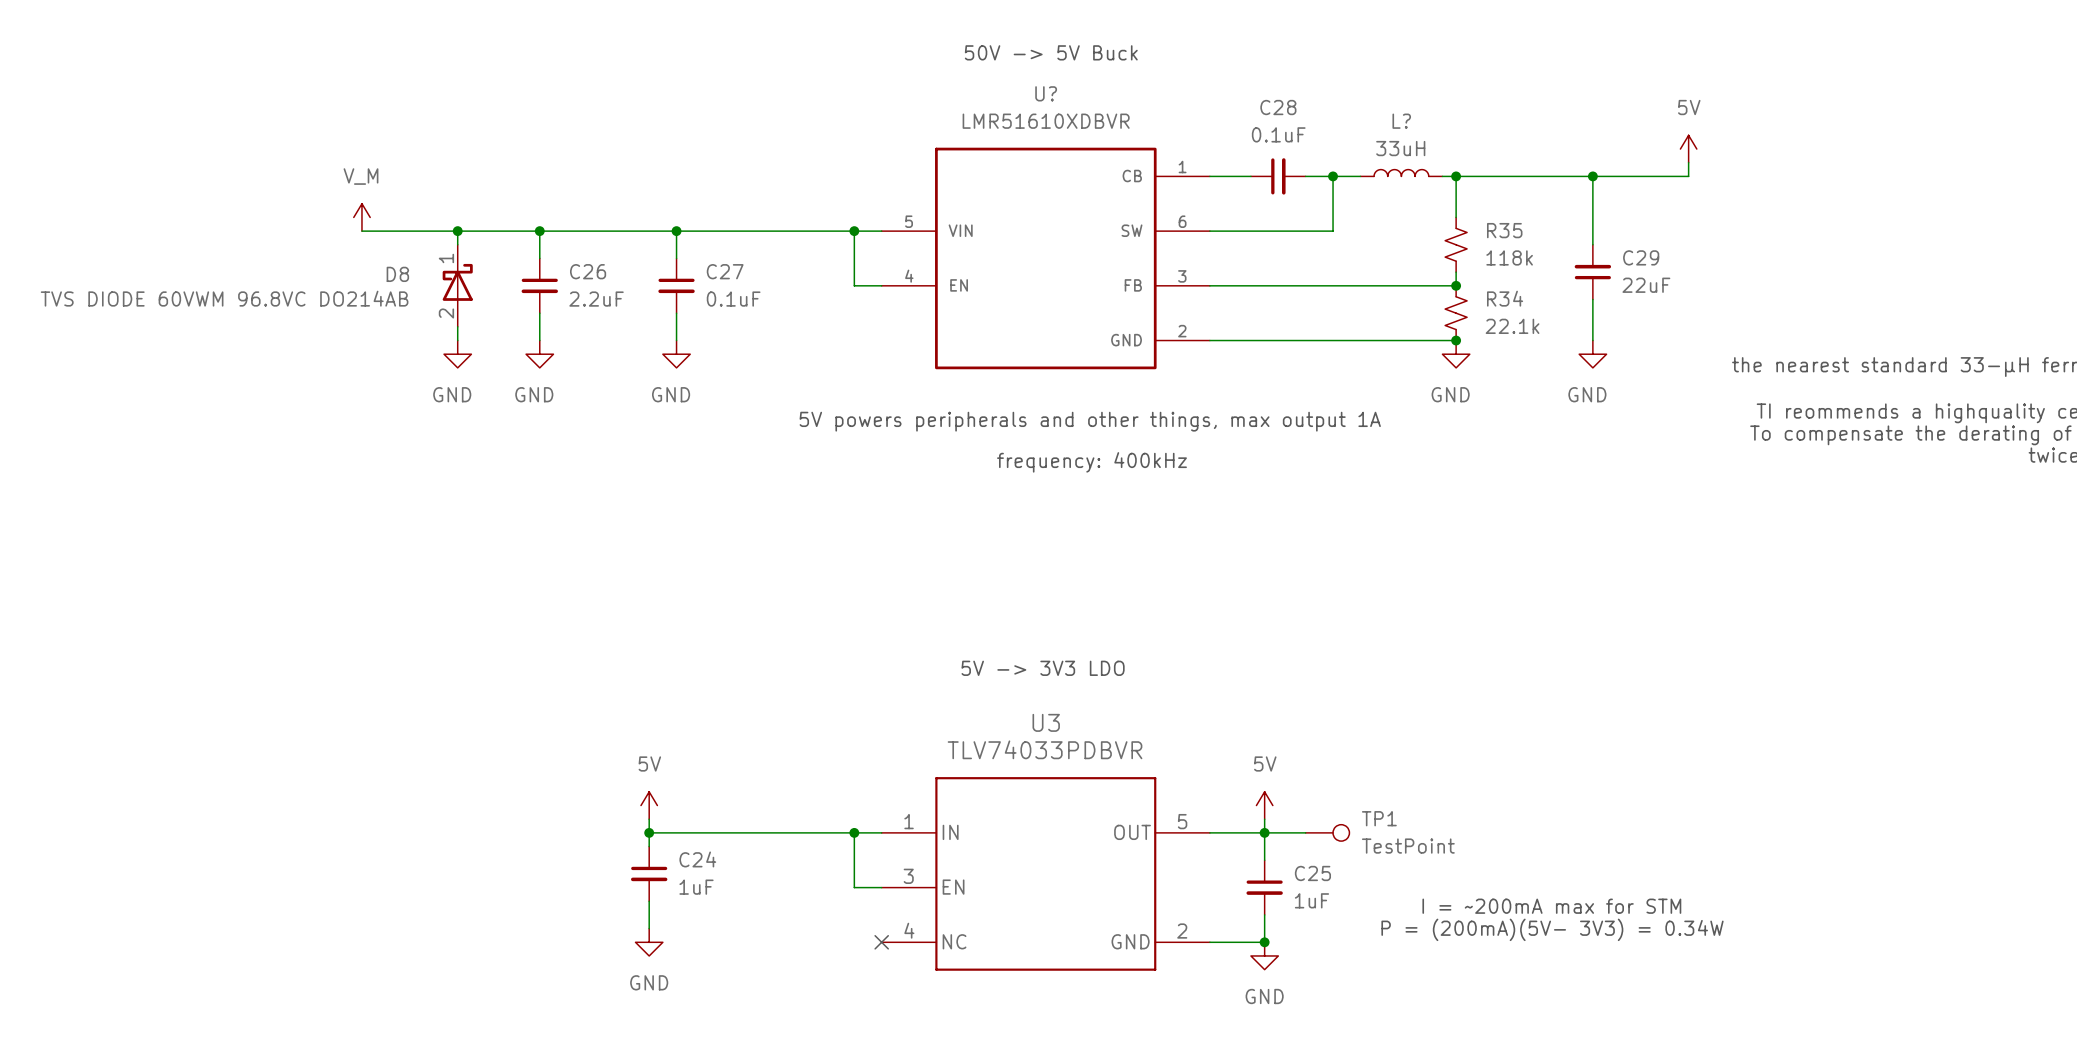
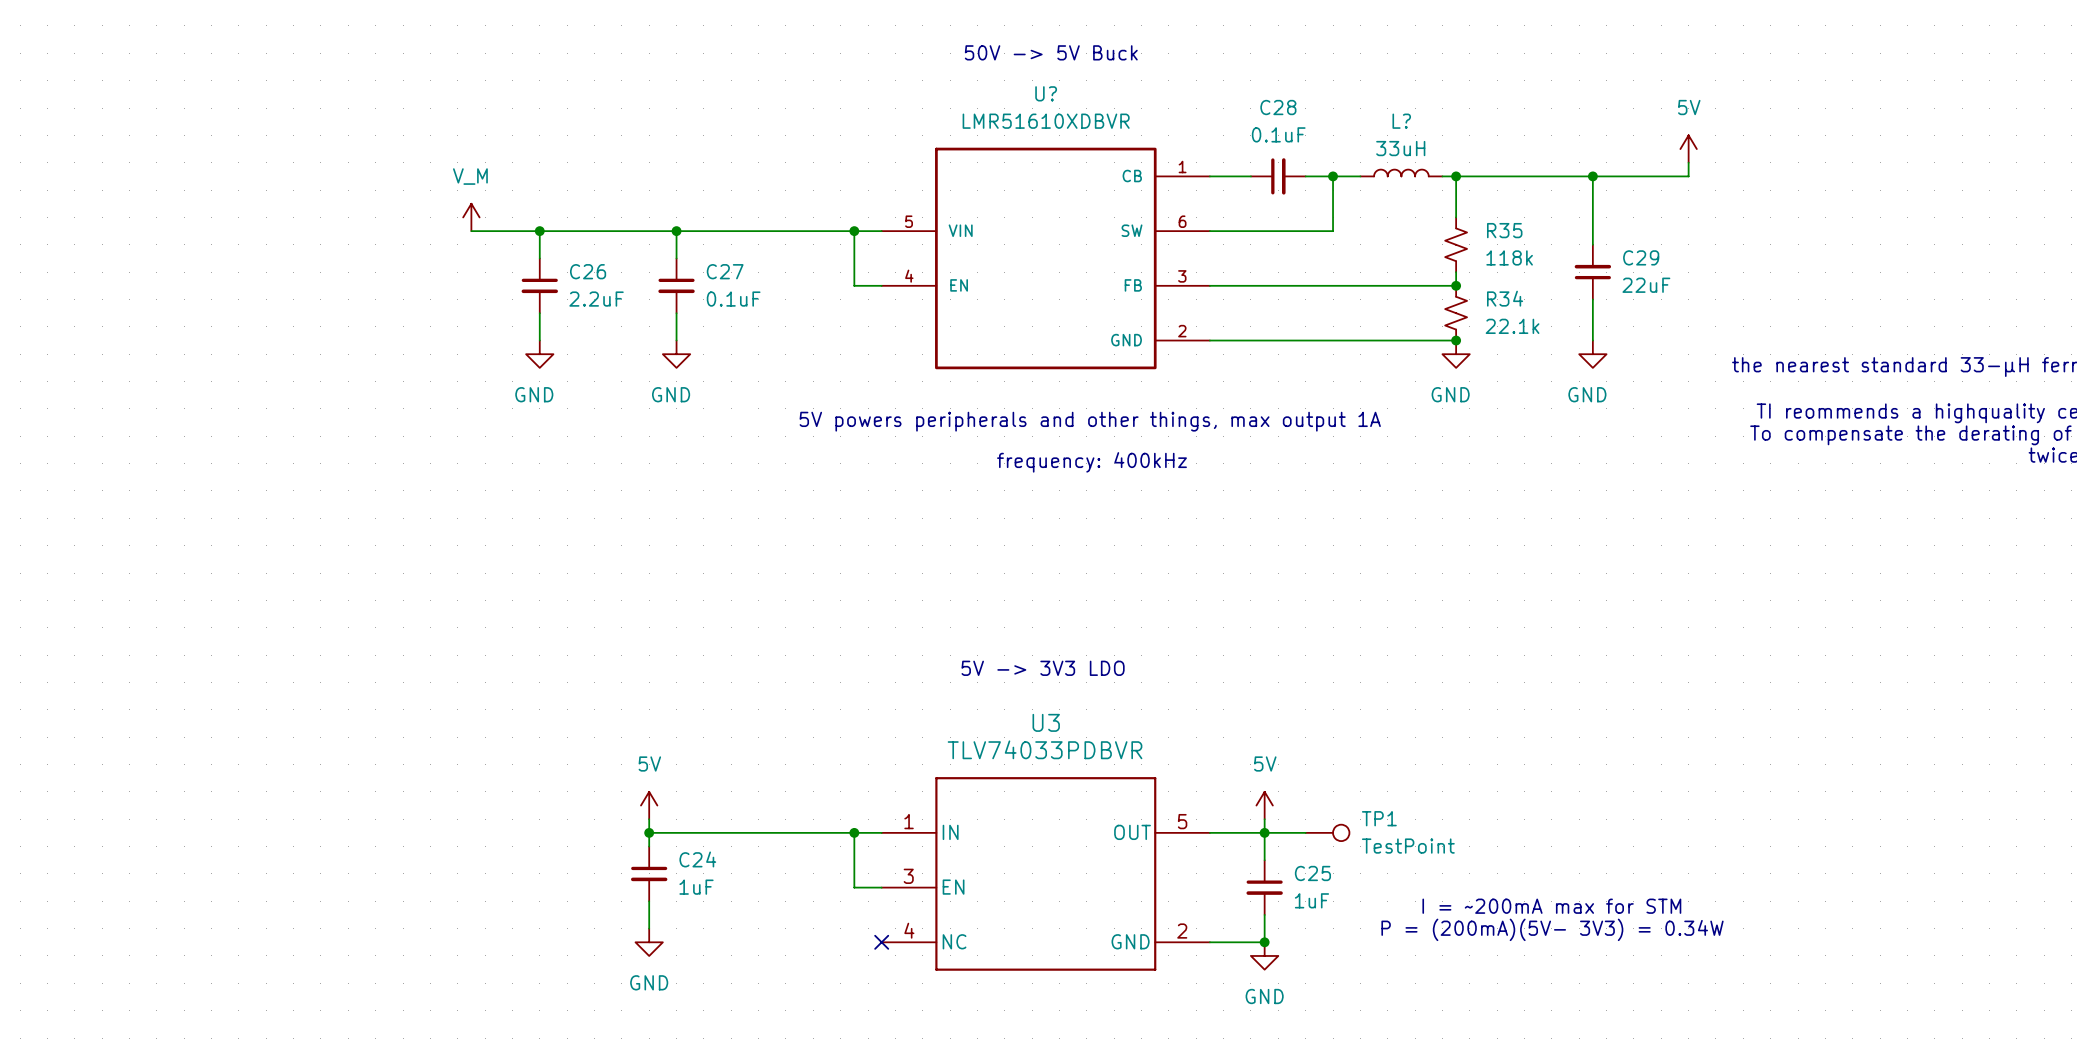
power symbol position: V_M (361, 217) -> V_M (471, 217)
wire: (361, 231) (471, 231) -> none
wire: (457, 231) (457, 244) -> none
junction: (457, 231) -> none
D8: TVS DIODE 60VWM 96.8VC DO214AB (457, 285) -> none
wire: (457, 326) (457, 340) -> none
power symbol: GND (457, 354) -> none

